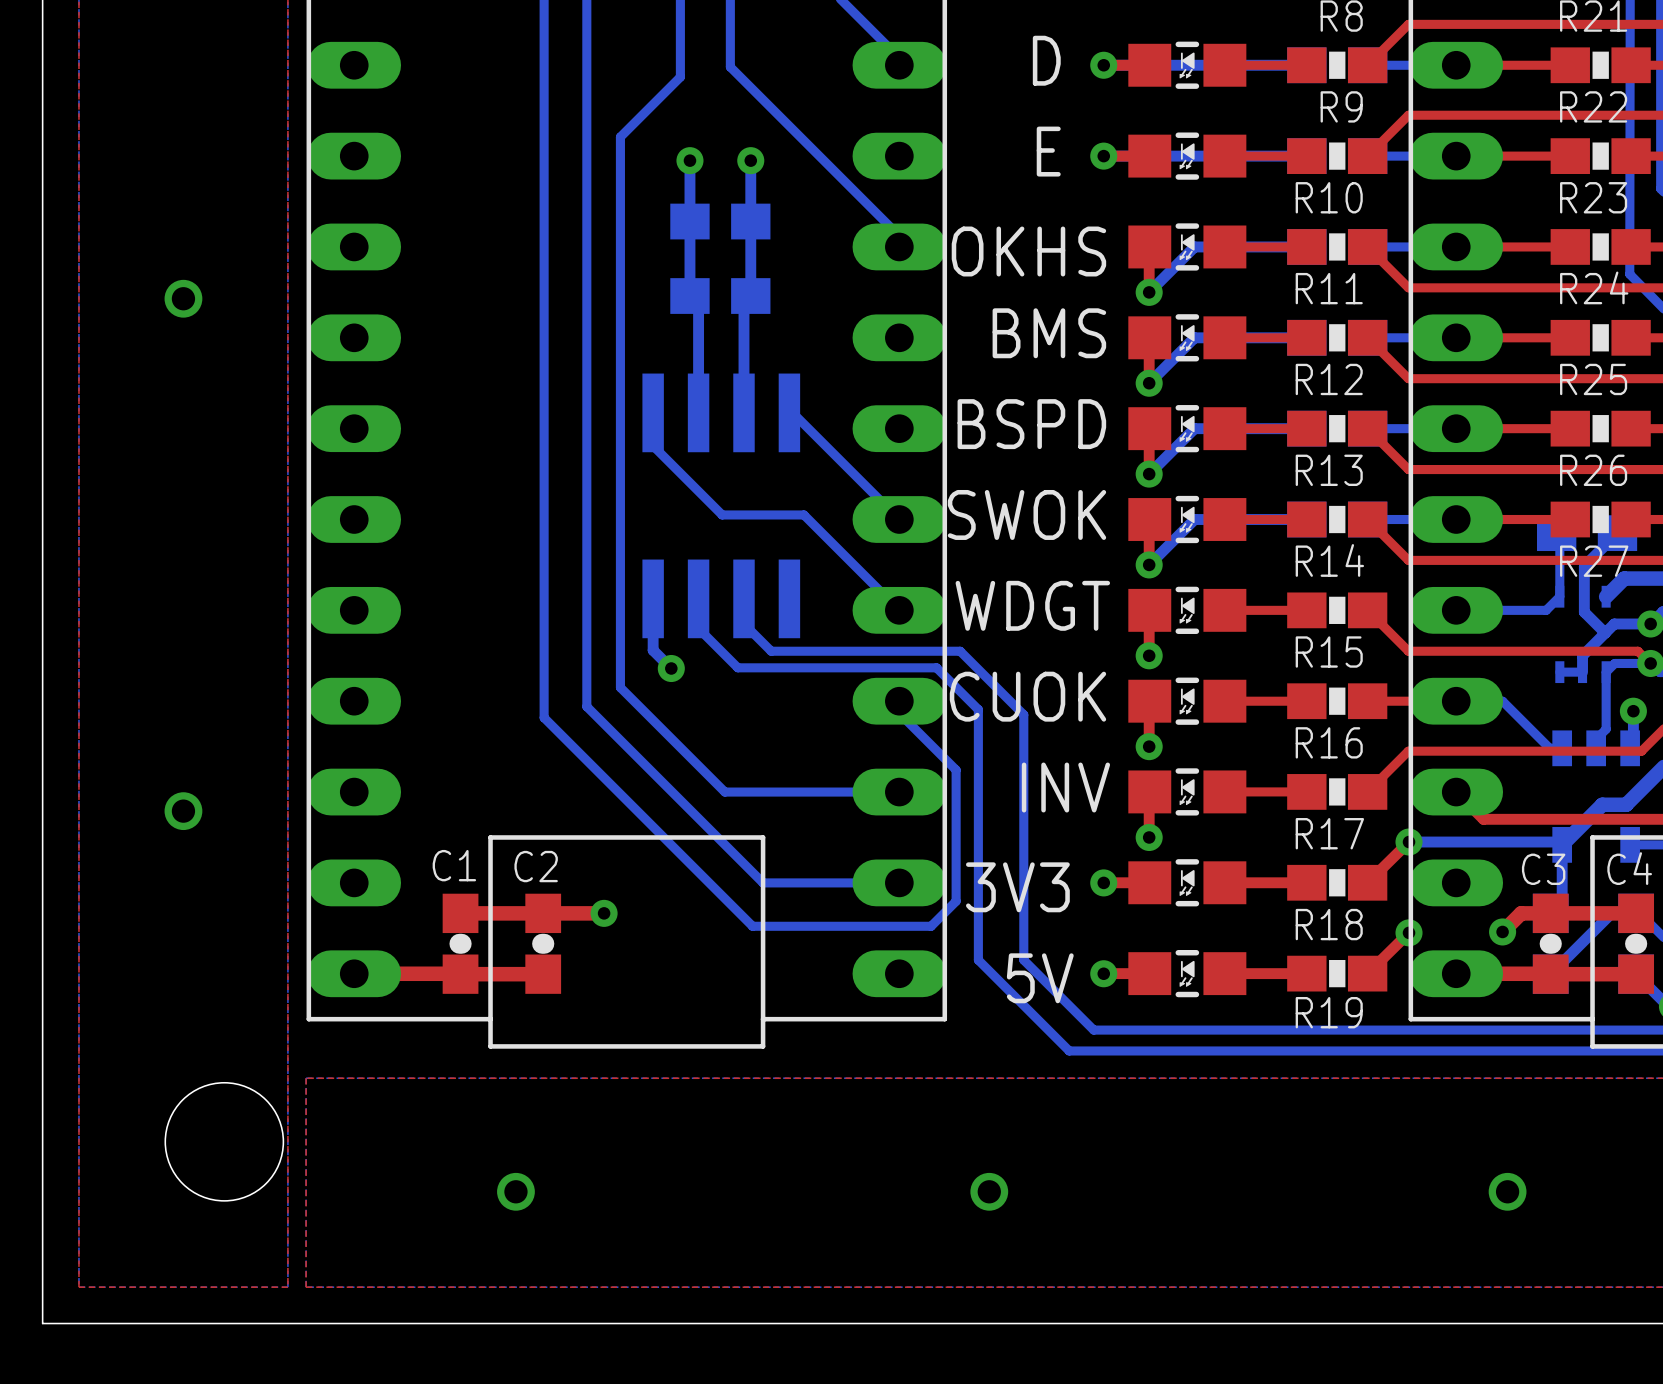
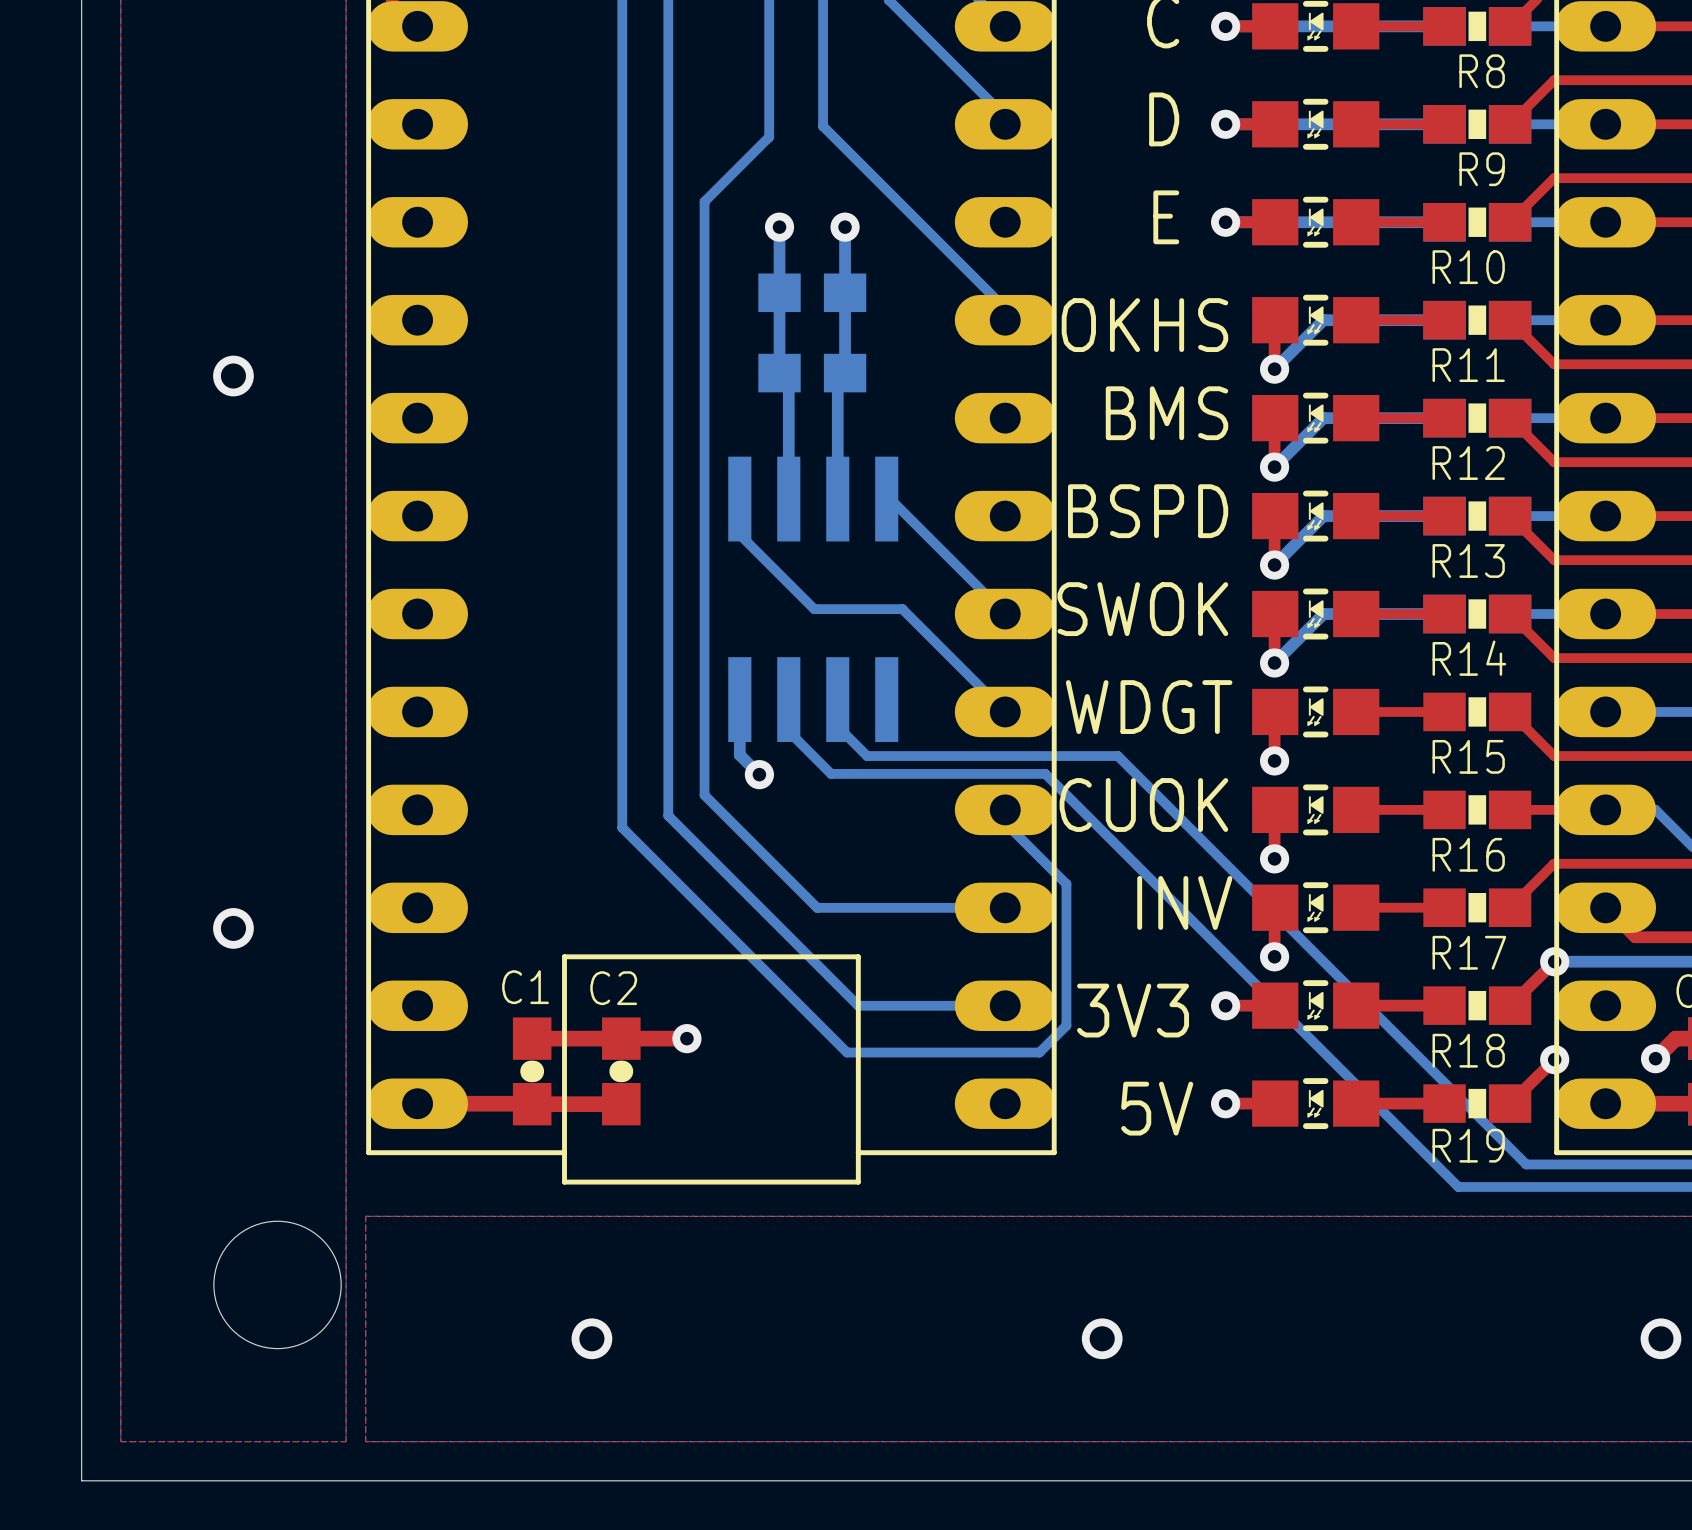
bottom track: (960, 651) (1023, 714) (1023, 960) (1093, 1030) (1382, 1030) -> (1070, 756) (1117, 756) (1526, 1164)
bottom track: (978, 709) (978, 960) (1069, 1050) (1319, 1050) -> (1090, 818) (1458, 1186)

